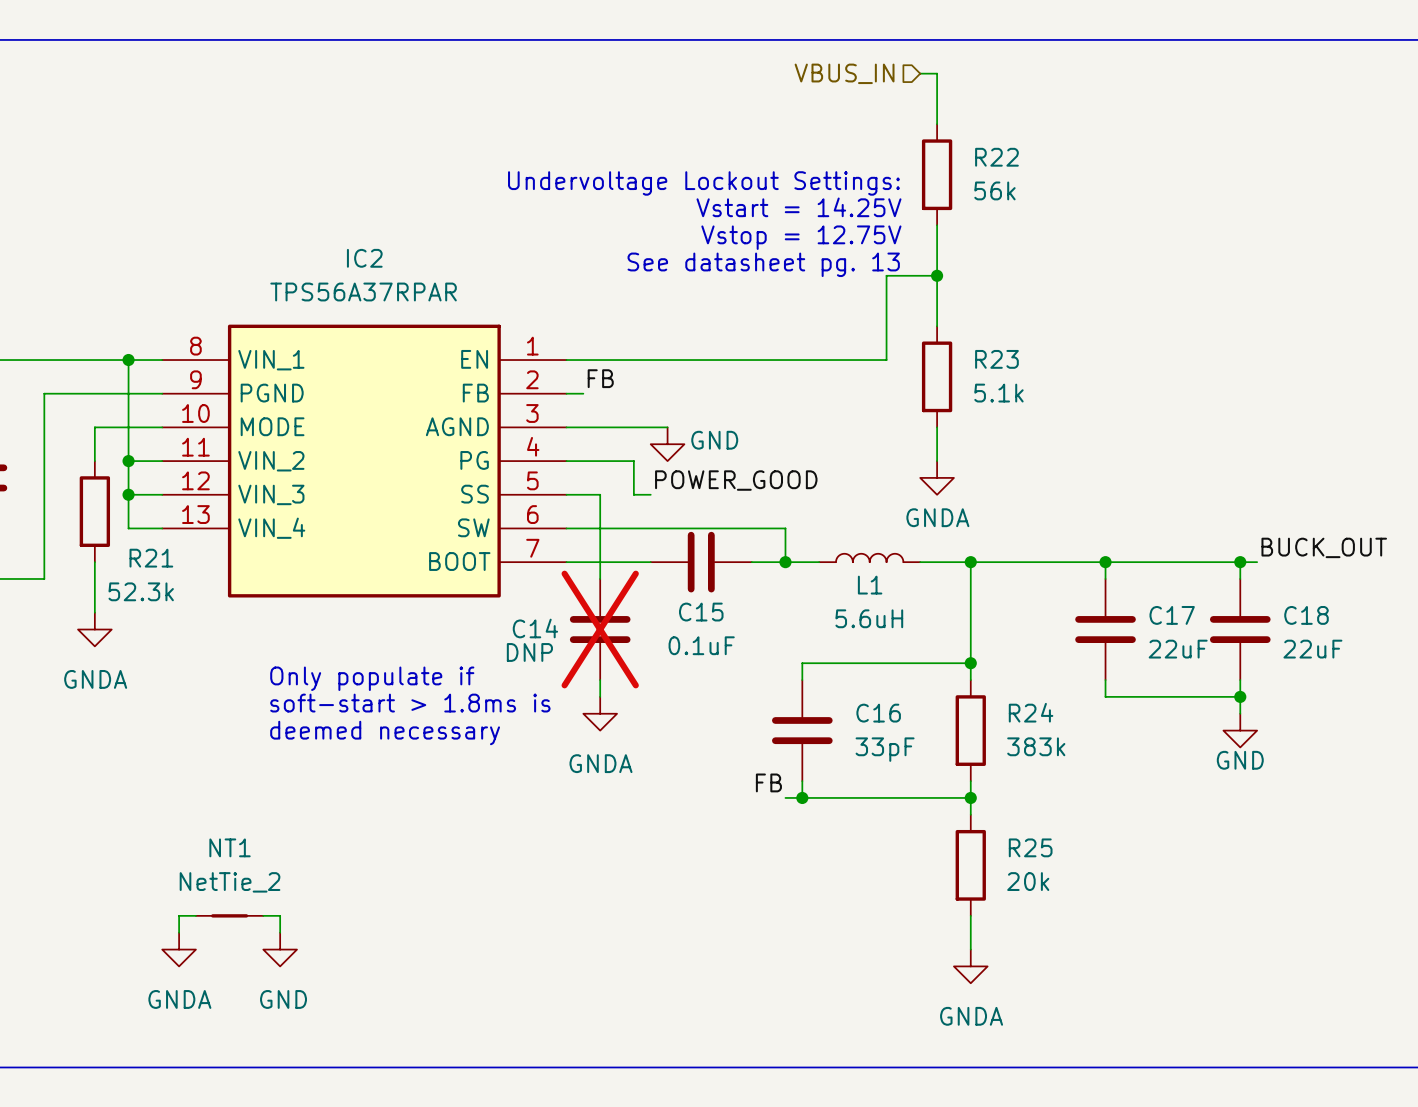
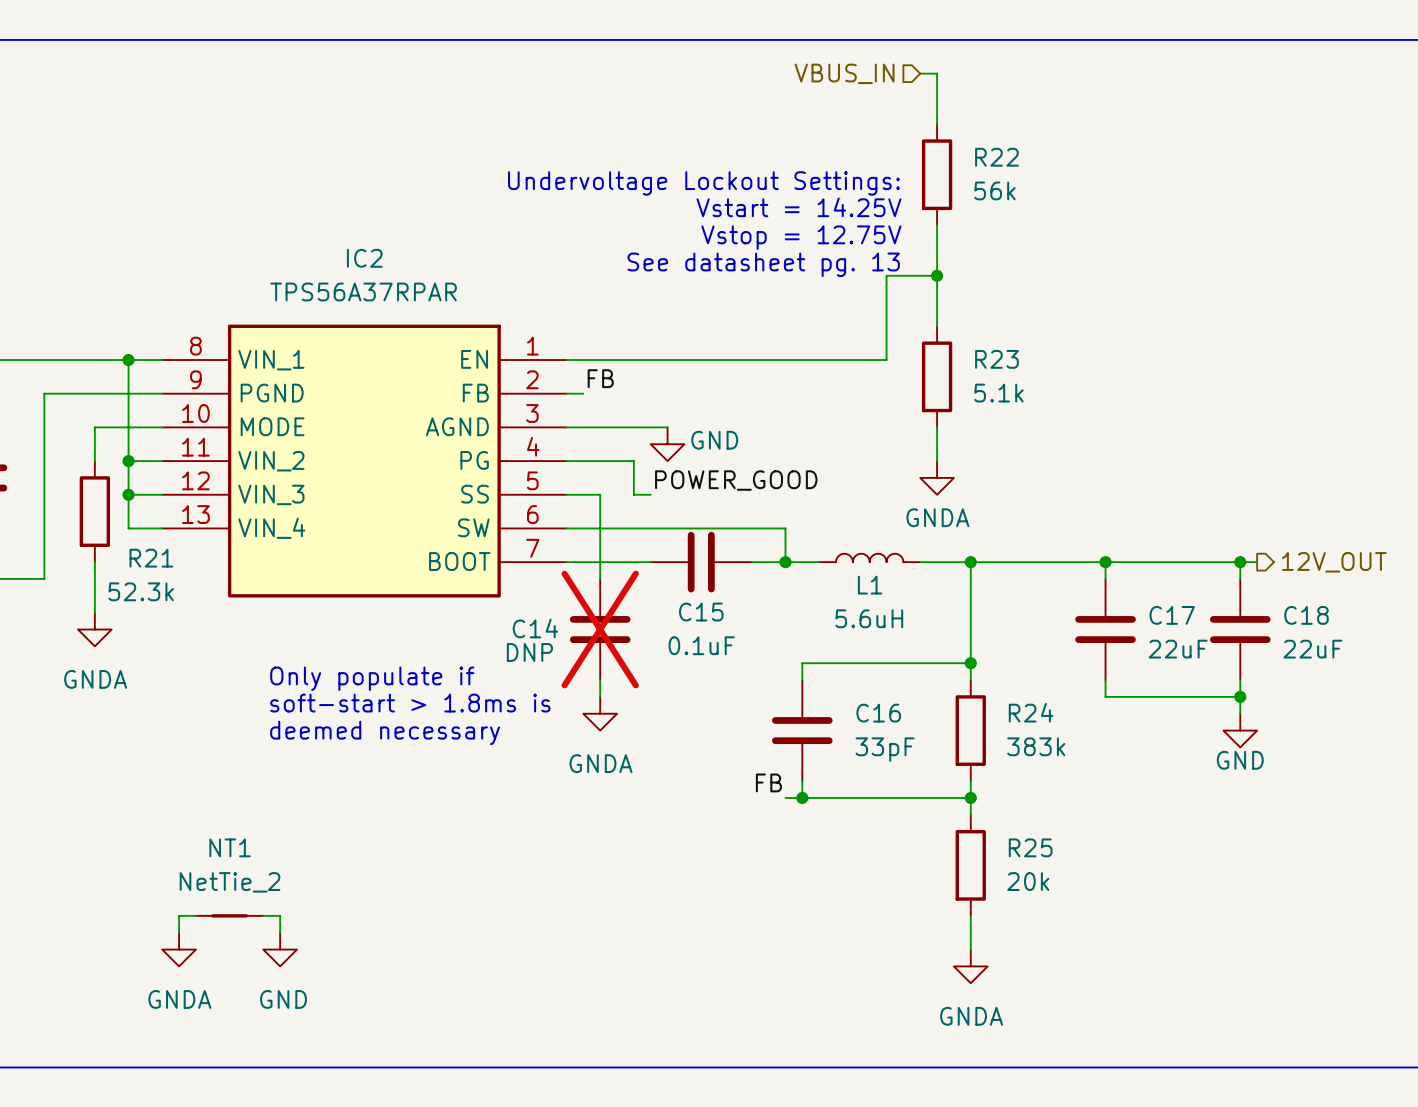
label: BUCK_OUT (1324, 547) -> none
hierarchical label: none -> 12V_OUT (1334, 562)

